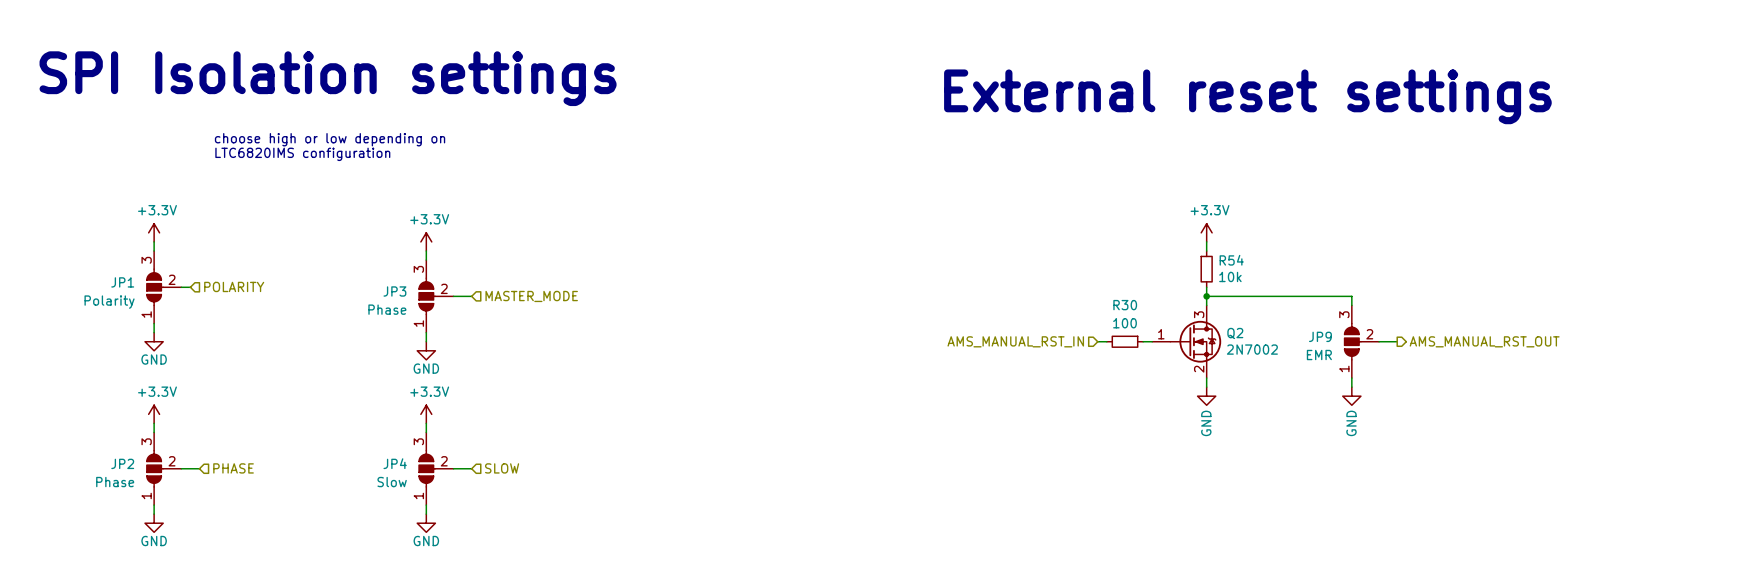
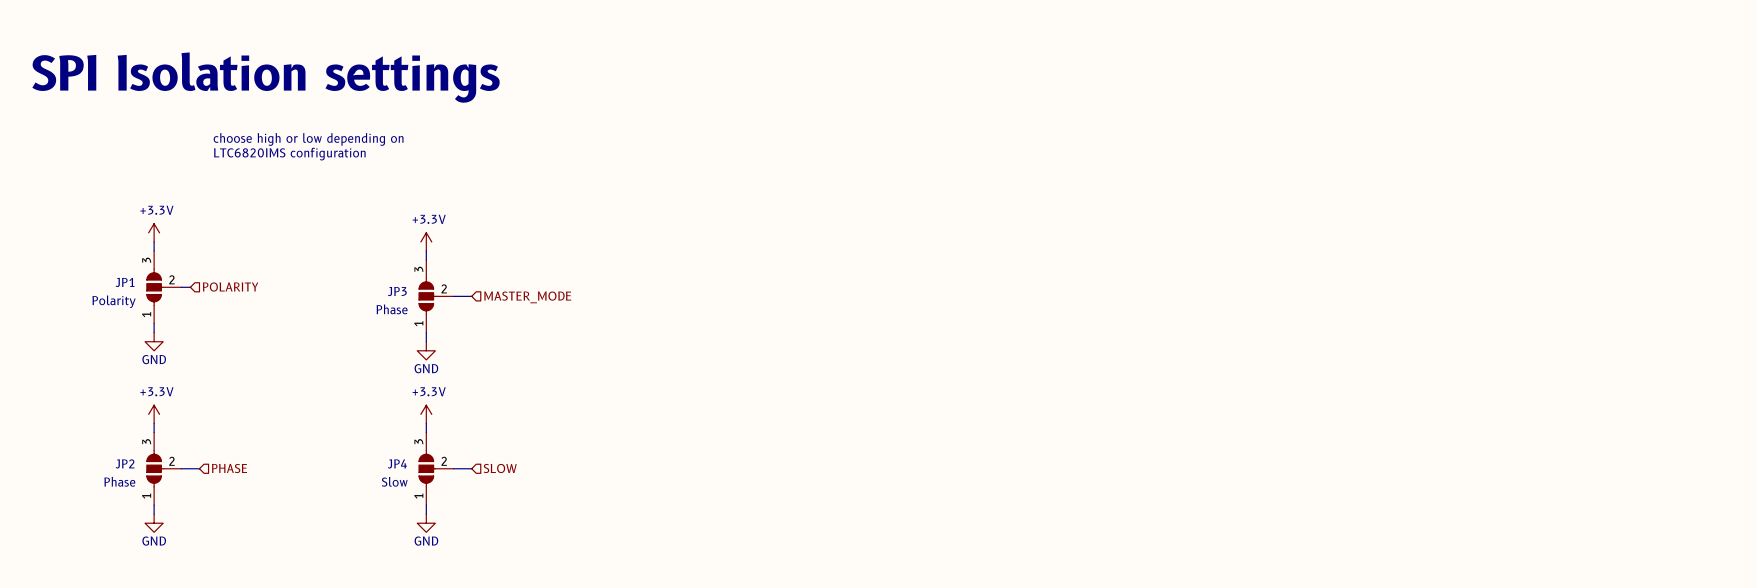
text: External reset settings (1247, 96) -> none
power symbol: +3.3V (1206, 232) -> none
wire: (1206, 241) (1206, 251) -> none
R54: 10k (1206, 269) -> none
wire: (1206, 287) (1206, 305) -> none
wire: (1206, 296) (1351, 296) (1351, 305) -> none
junction: (1206, 296) -> none
hierarchical label: AMS_MANUAL_RST_IN (1015, 341) -> none
wire: (1097, 341) (1106, 341) -> none
R30: 100 (1125, 341) -> none
wire: (1143, 341) (1152, 341) -> none
Q2: 2N7002 (1186, 341) -> none
JP9: EMR (1361, 341) -> none
wire: (1379, 341) (1397, 341) -> none
hierarchical label: AMS_MANUAL_RST_OUT (1484, 341) -> none
wire: (1206, 378) (1206, 387) -> none
wire: (1351, 378) (1351, 387) -> none
power symbol: GND (1206, 396) -> none
power symbol: GND (1351, 396) -> none

